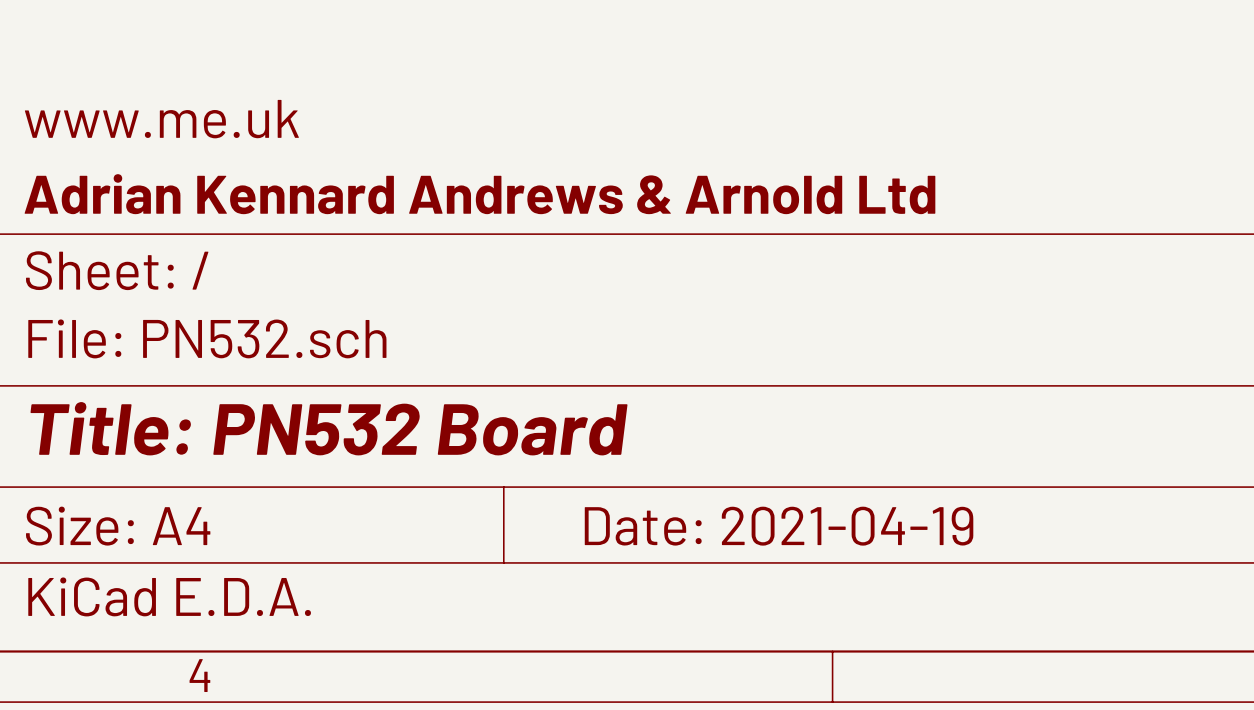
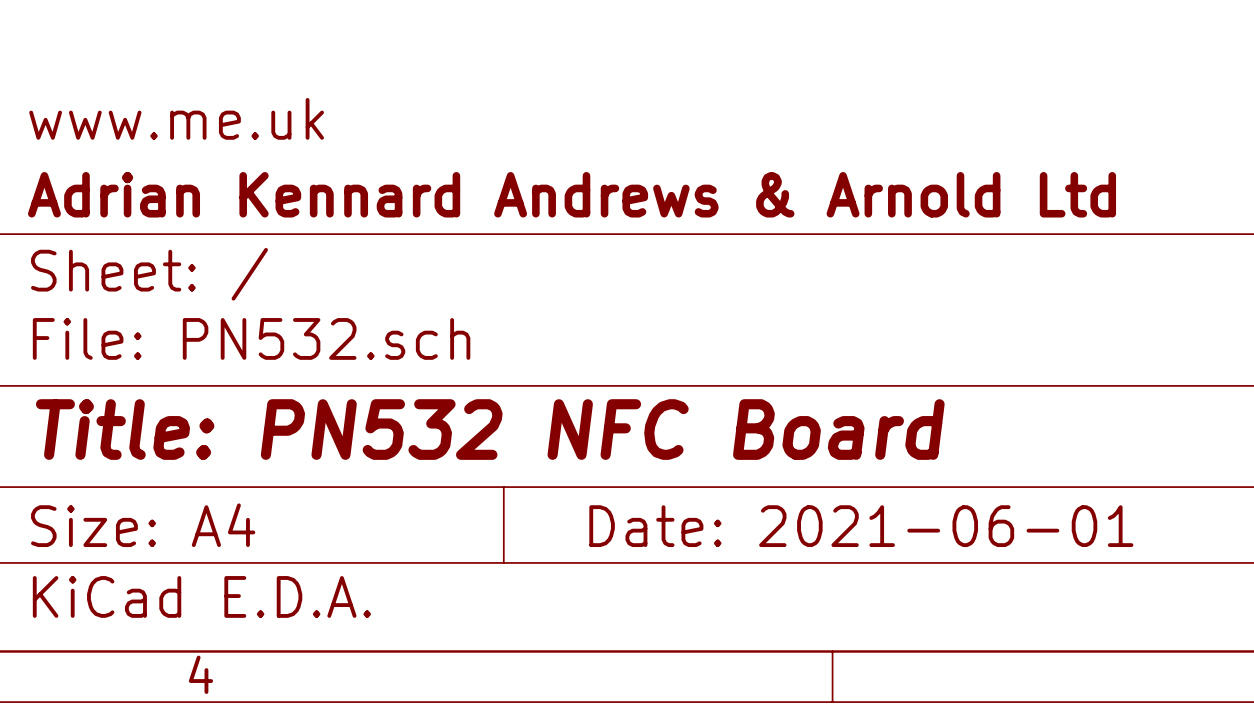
title block: Title: PN532 Board (329, 428) -> Title: PN532 NFC Board (490, 429)
title block: Date: 2021-04-19 (779, 526) -> Date: 2021-06-01 (861, 526)

